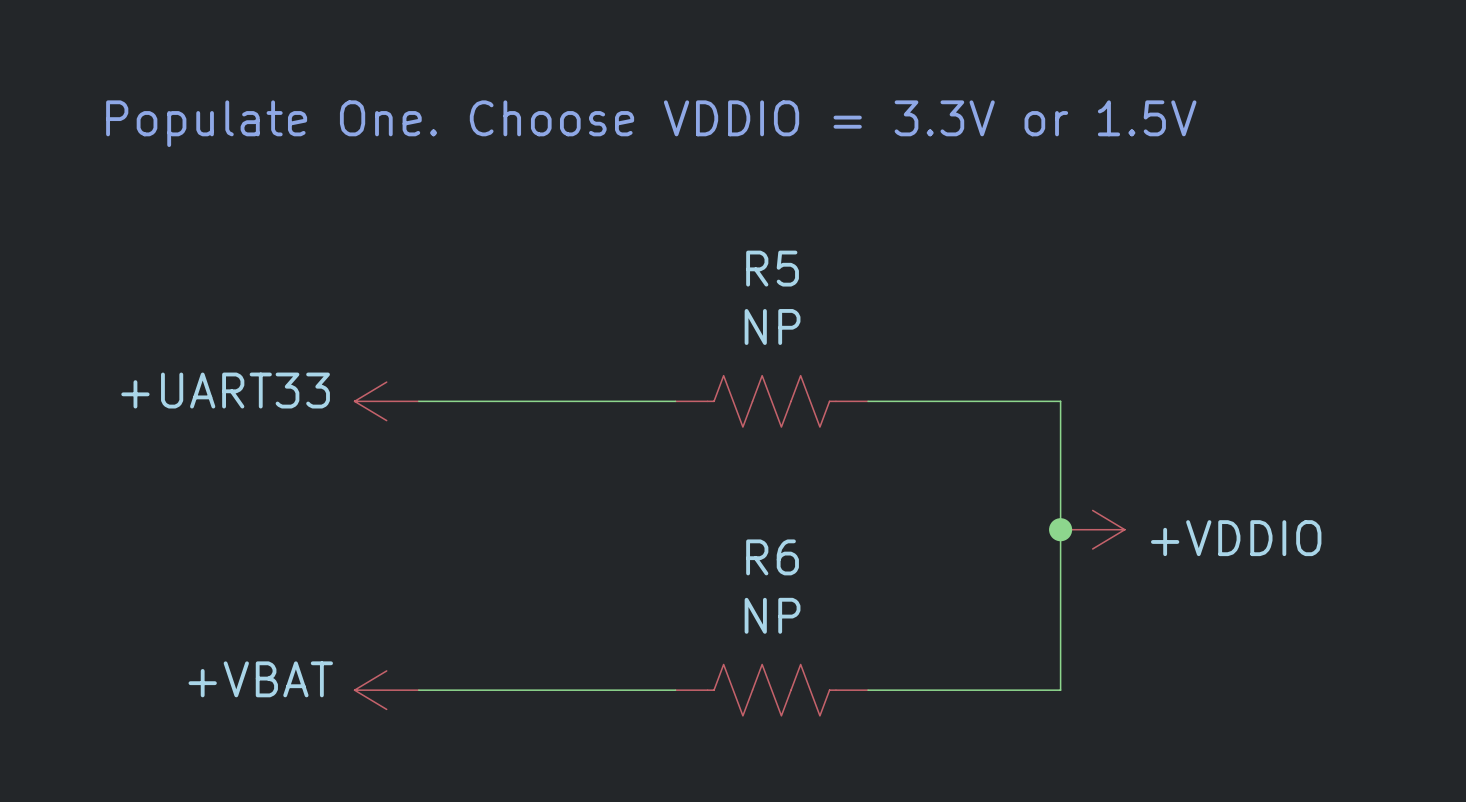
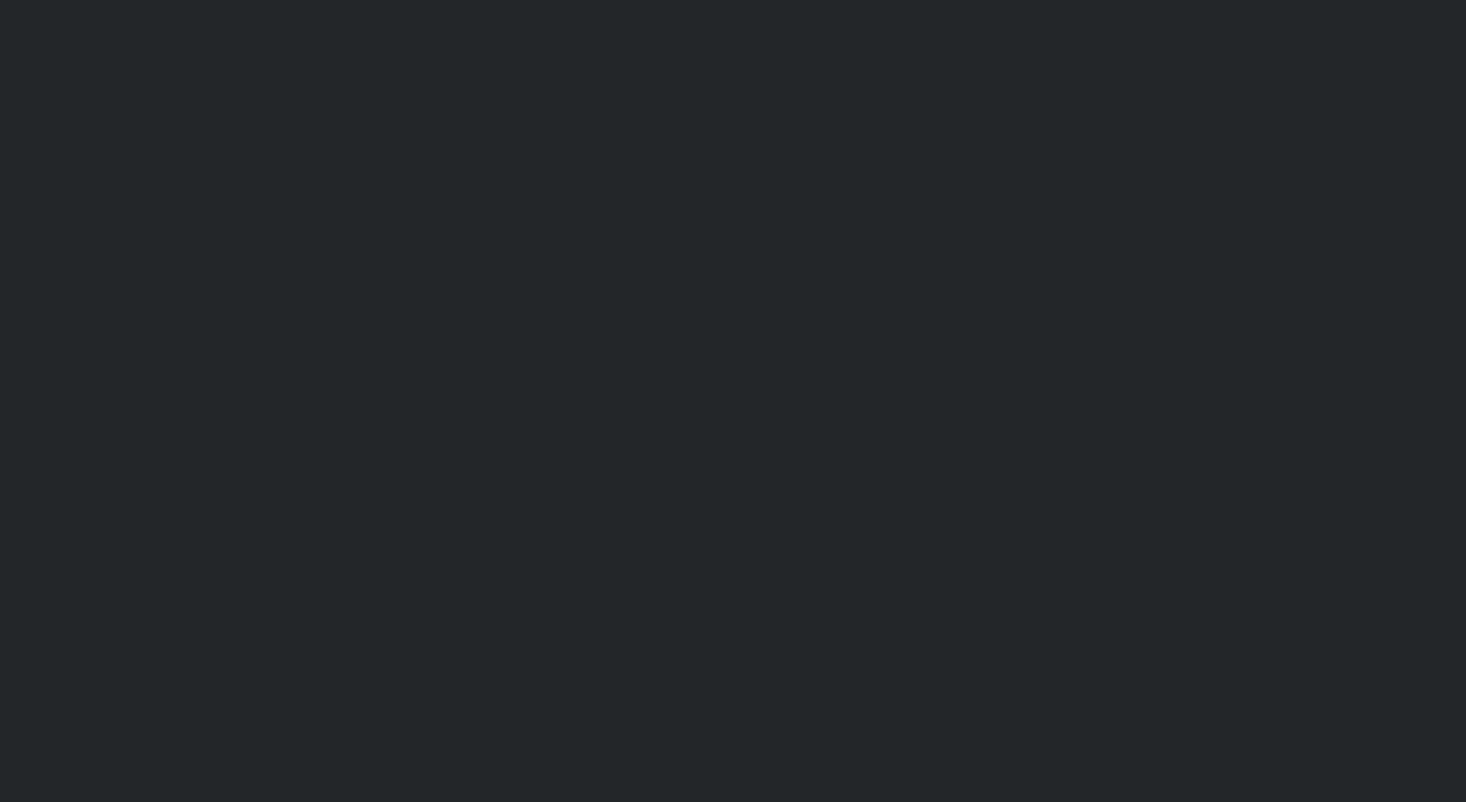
text: Populate One. Choose VDDIO = 3.3V or 1.5V (651, 123) -> none
power symbol: +UART33 (386, 401) -> none
wire: (418, 401) (675, 401) -> none
R5: NP (771, 401) -> none
wire: (868, 401) (1060, 401) (1060, 690) (868, 690) -> none
junction: (1060, 529) -> none
power symbol: +VDDIO (1092, 529) -> none
power symbol: +VBAT (386, 690) -> none
wire: (418, 690) (675, 690) -> none
R6: NP (771, 690) -> none

